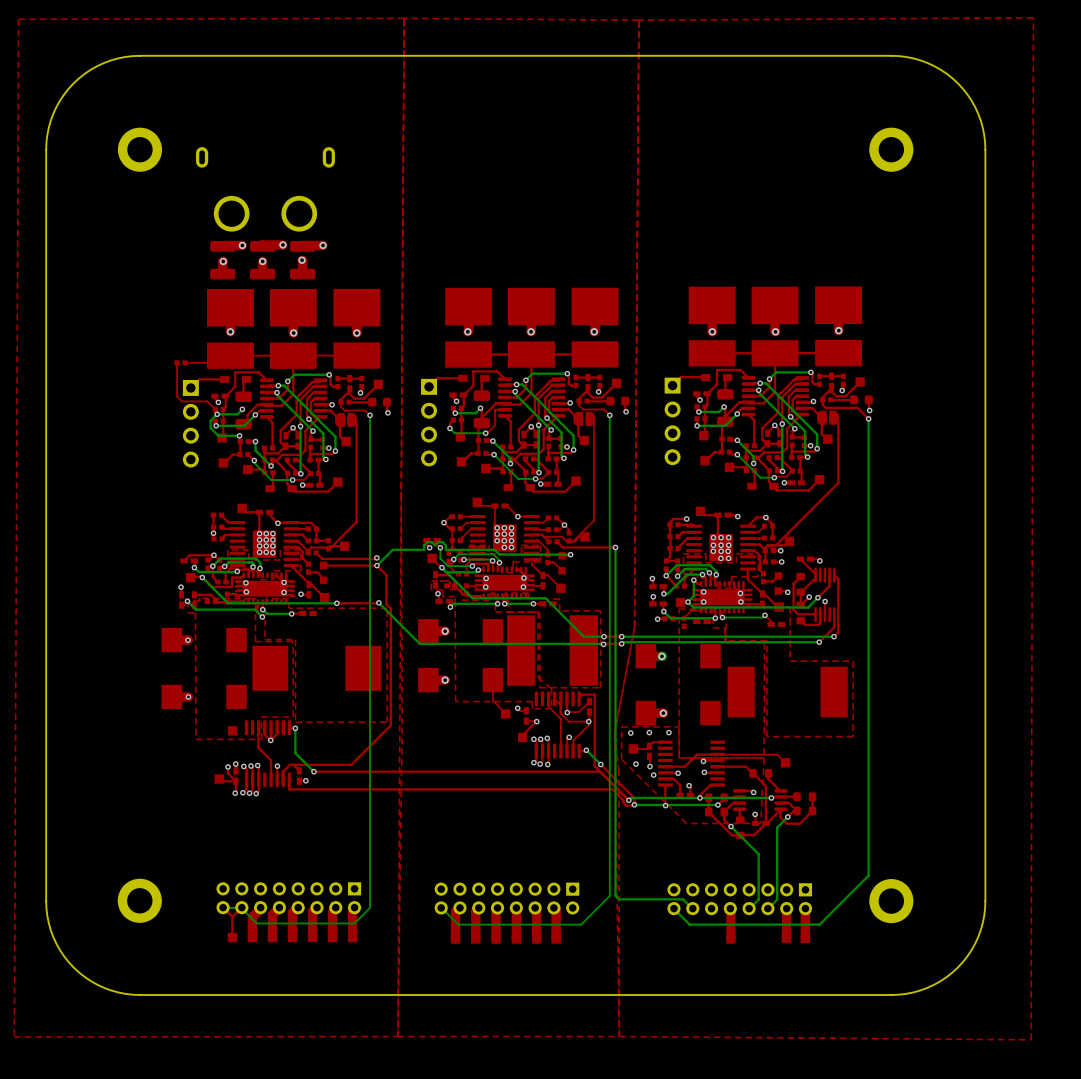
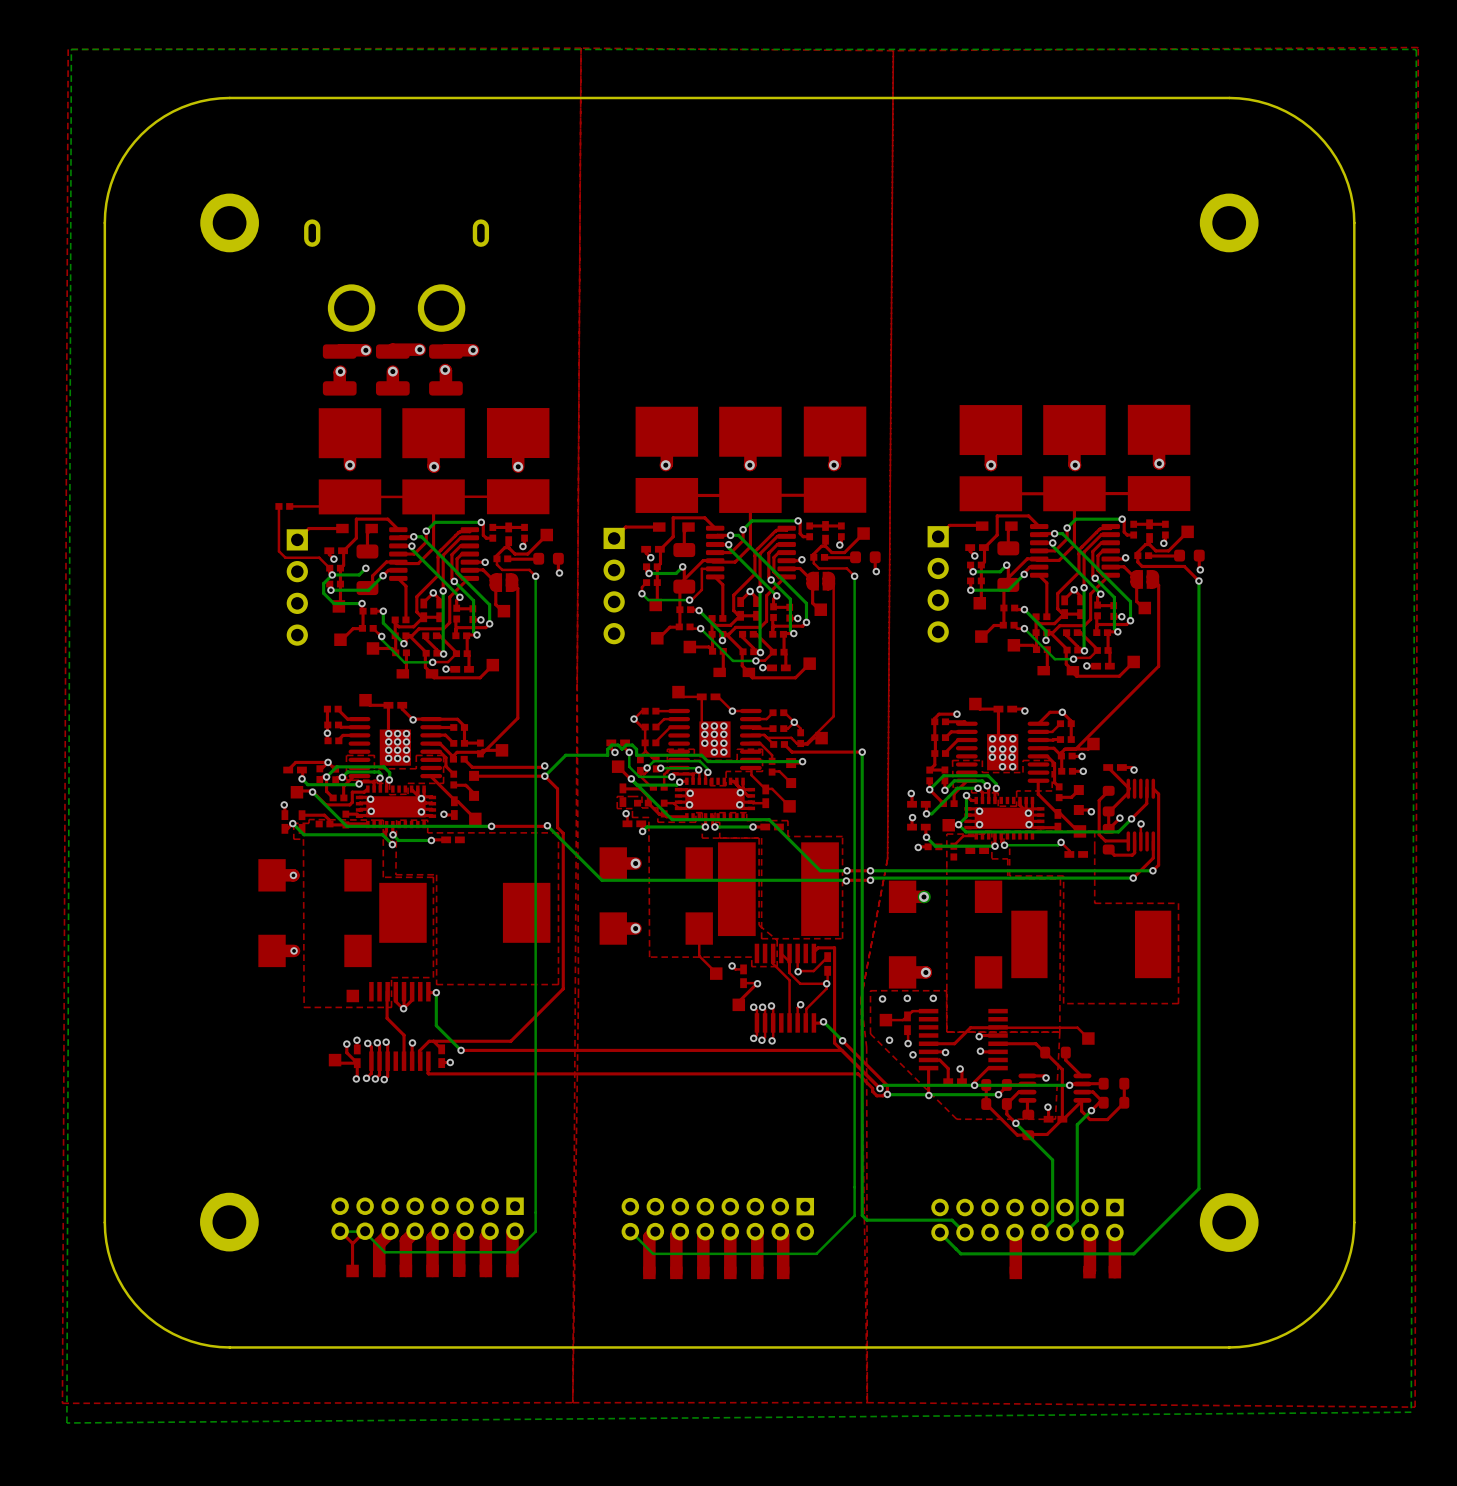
bottom zone outline: none -> (1415, 49) (71, 49) (66, 1423) (1411, 1412) (1415, 49)

